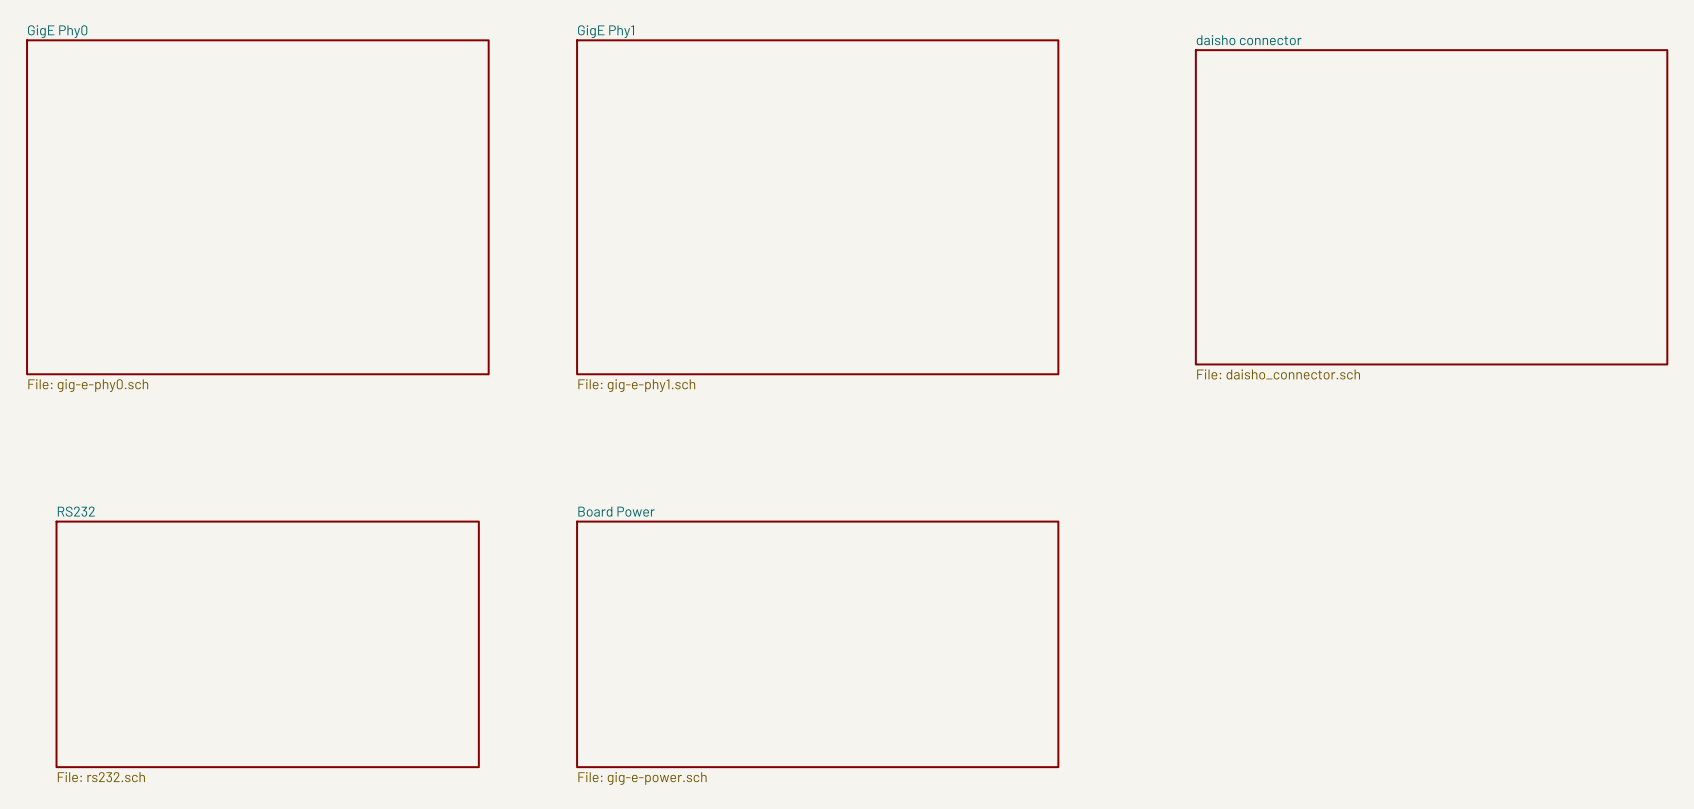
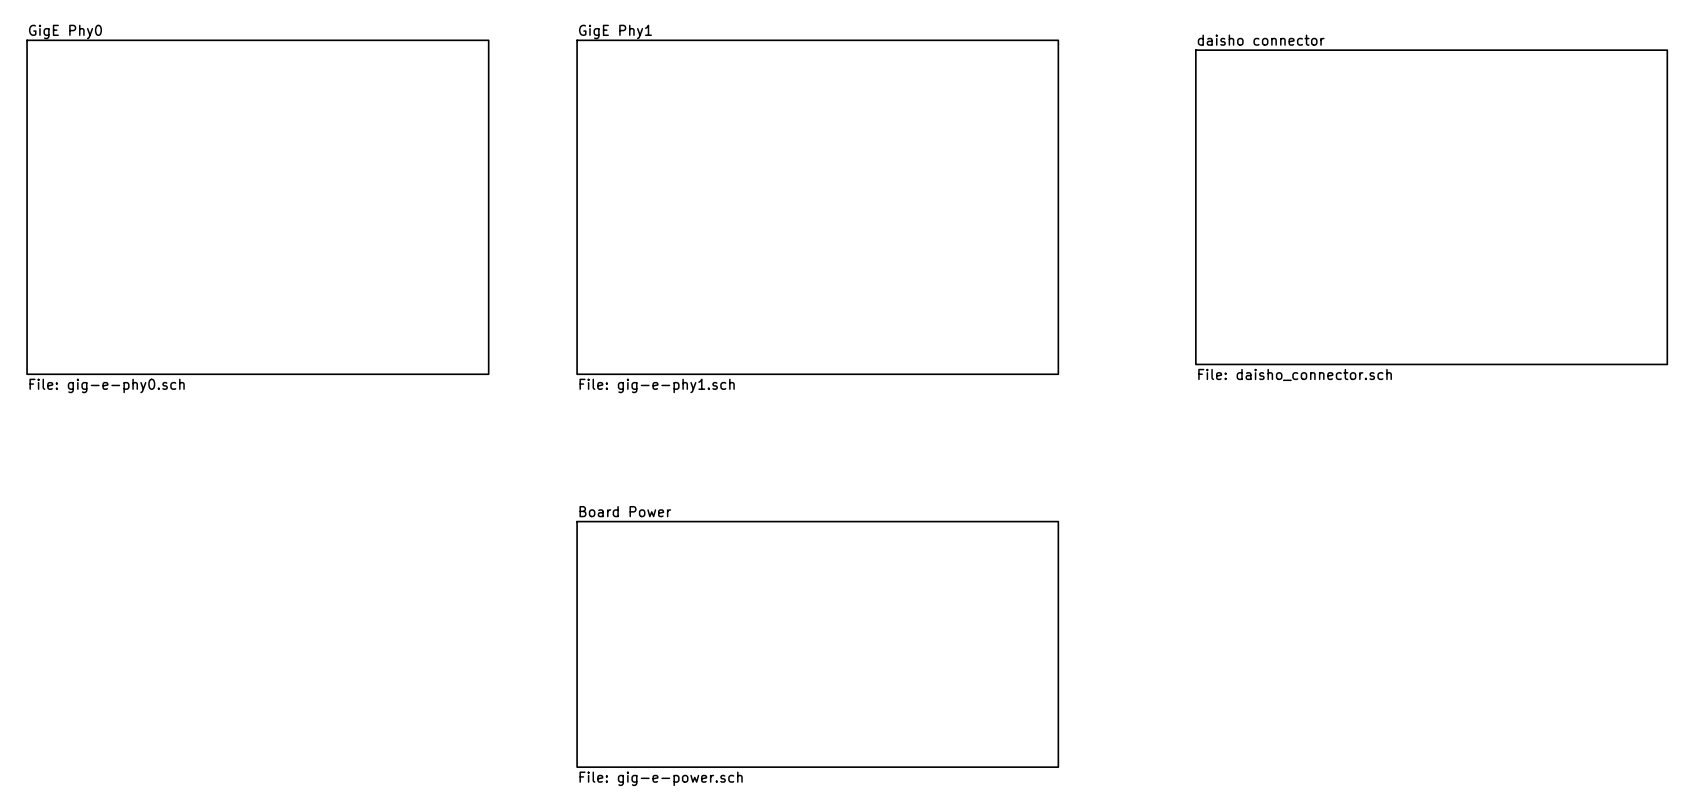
sheet RS232: File: rs232.sch (267, 644) -> none

